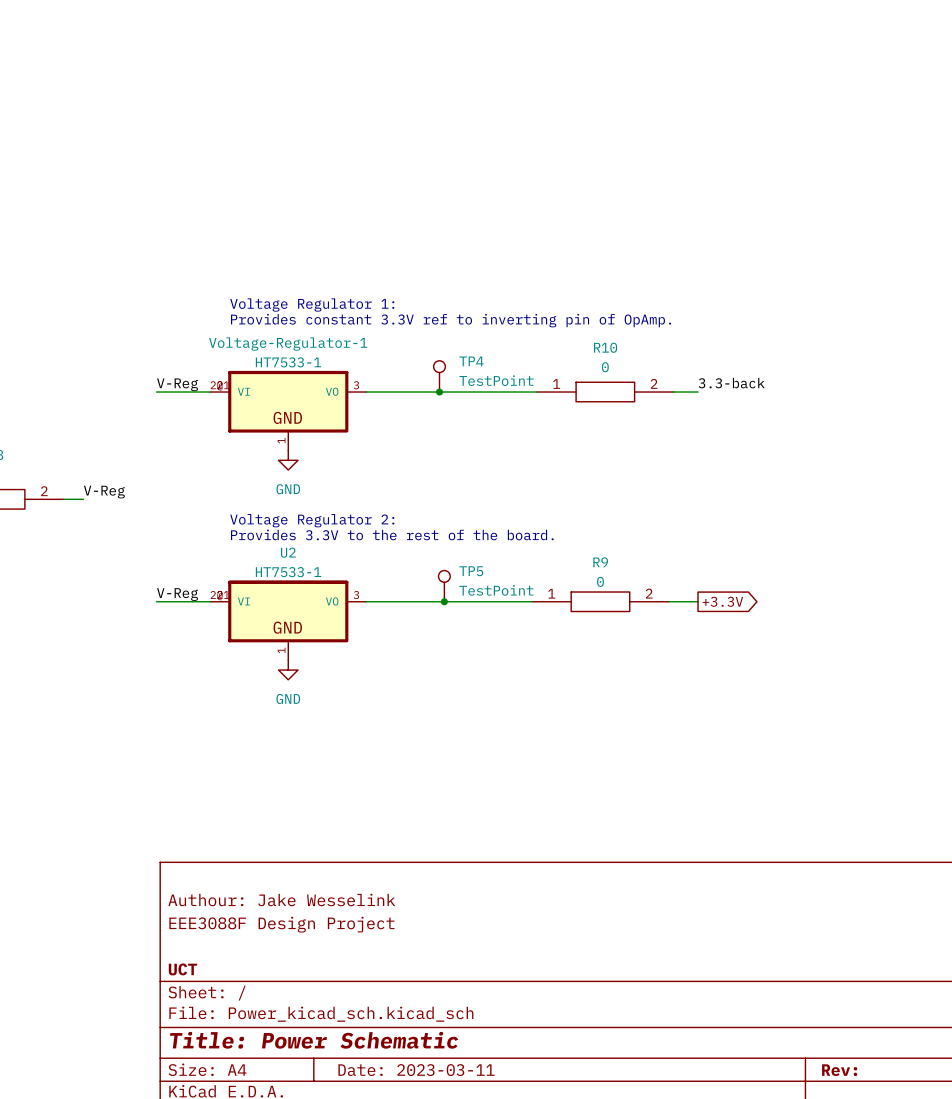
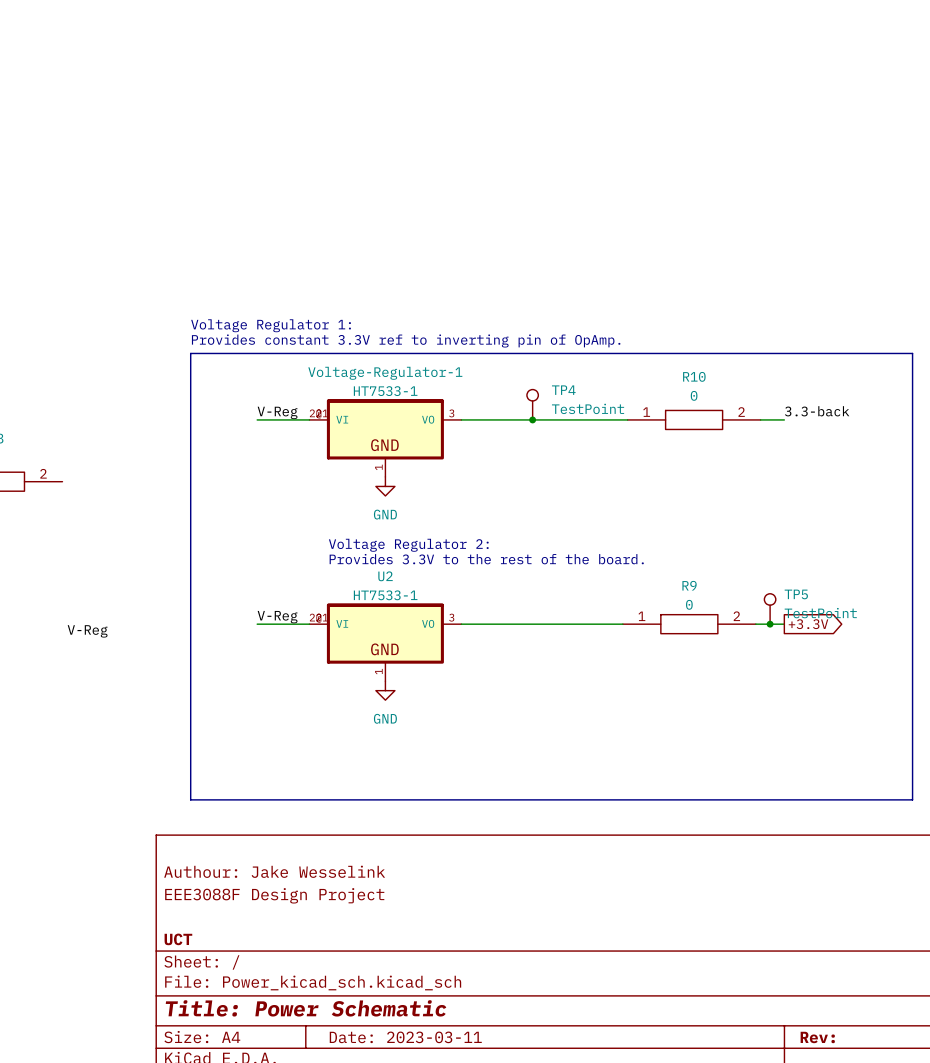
text position: Voltage Regulator 1: (312, 305) -> Voltage Regulator 1: (271, 325)
text position: Provides constant 3.3V ref to inverting pin of OpAmp. (451, 320) -> Provides constant 3.3V ref to inverting pin of OpAmp. (406, 341)
line: none -> (190, 353) (912, 353) (912, 799) (190, 799) (190, 353)
TP4 position: (439, 376) -> (532, 404)
label position: 3.3-back (731, 383) -> 3.3-back (817, 411)
label: V-Reg (177, 384) -> none
wire: (156, 392) (210, 392) -> (257, 419) (309, 419)
wire: (366, 392) (537, 392) -> (461, 419) (627, 419)
junction: (439, 392) -> none
R10 position: (605, 392) -> (694, 419)
wire: (673, 392) (698, 392) -> (760, 419) (784, 419)
Voltage-Regulator-1 position: (288, 410) -> (385, 438)
label: none -> V-Reg (277, 412)
junction: none -> (532, 419)
power symbol: GND (288, 460) -> none
label: V-Reg (104, 492) -> none
wire: (63, 499) (83, 499) -> none
power symbol: none -> GND (385, 486)
text position: Voltage Regulator 2: (312, 520) -> Voltage Regulator 2: (408, 545)
text position: Provides 3.3V to the rest of the board. (392, 534) -> Provides 3.3V to the rest of the board. (486, 559)
TP5 position: (444, 586) -> (770, 608)
label: V-Reg (177, 594) -> none
wire: (156, 601) (210, 601) -> (257, 624) (309, 624)
wire: (366, 601) (532, 601) -> (461, 624) (622, 624)
junction: (444, 601) -> none
R9 position: (600, 601) -> (689, 624)
wire: (668, 601) (698, 601) -> (755, 624) (784, 624)
global label position: +3.3V (722, 601) -> +3.3V (808, 624)
U2 position: (288, 620) -> (385, 642)
label: none -> V-Reg (277, 617)
junction: none -> (770, 624)
label: none -> V-Reg (87, 631)
power symbol: GND (288, 670) -> none
power symbol: none -> GND (385, 690)

